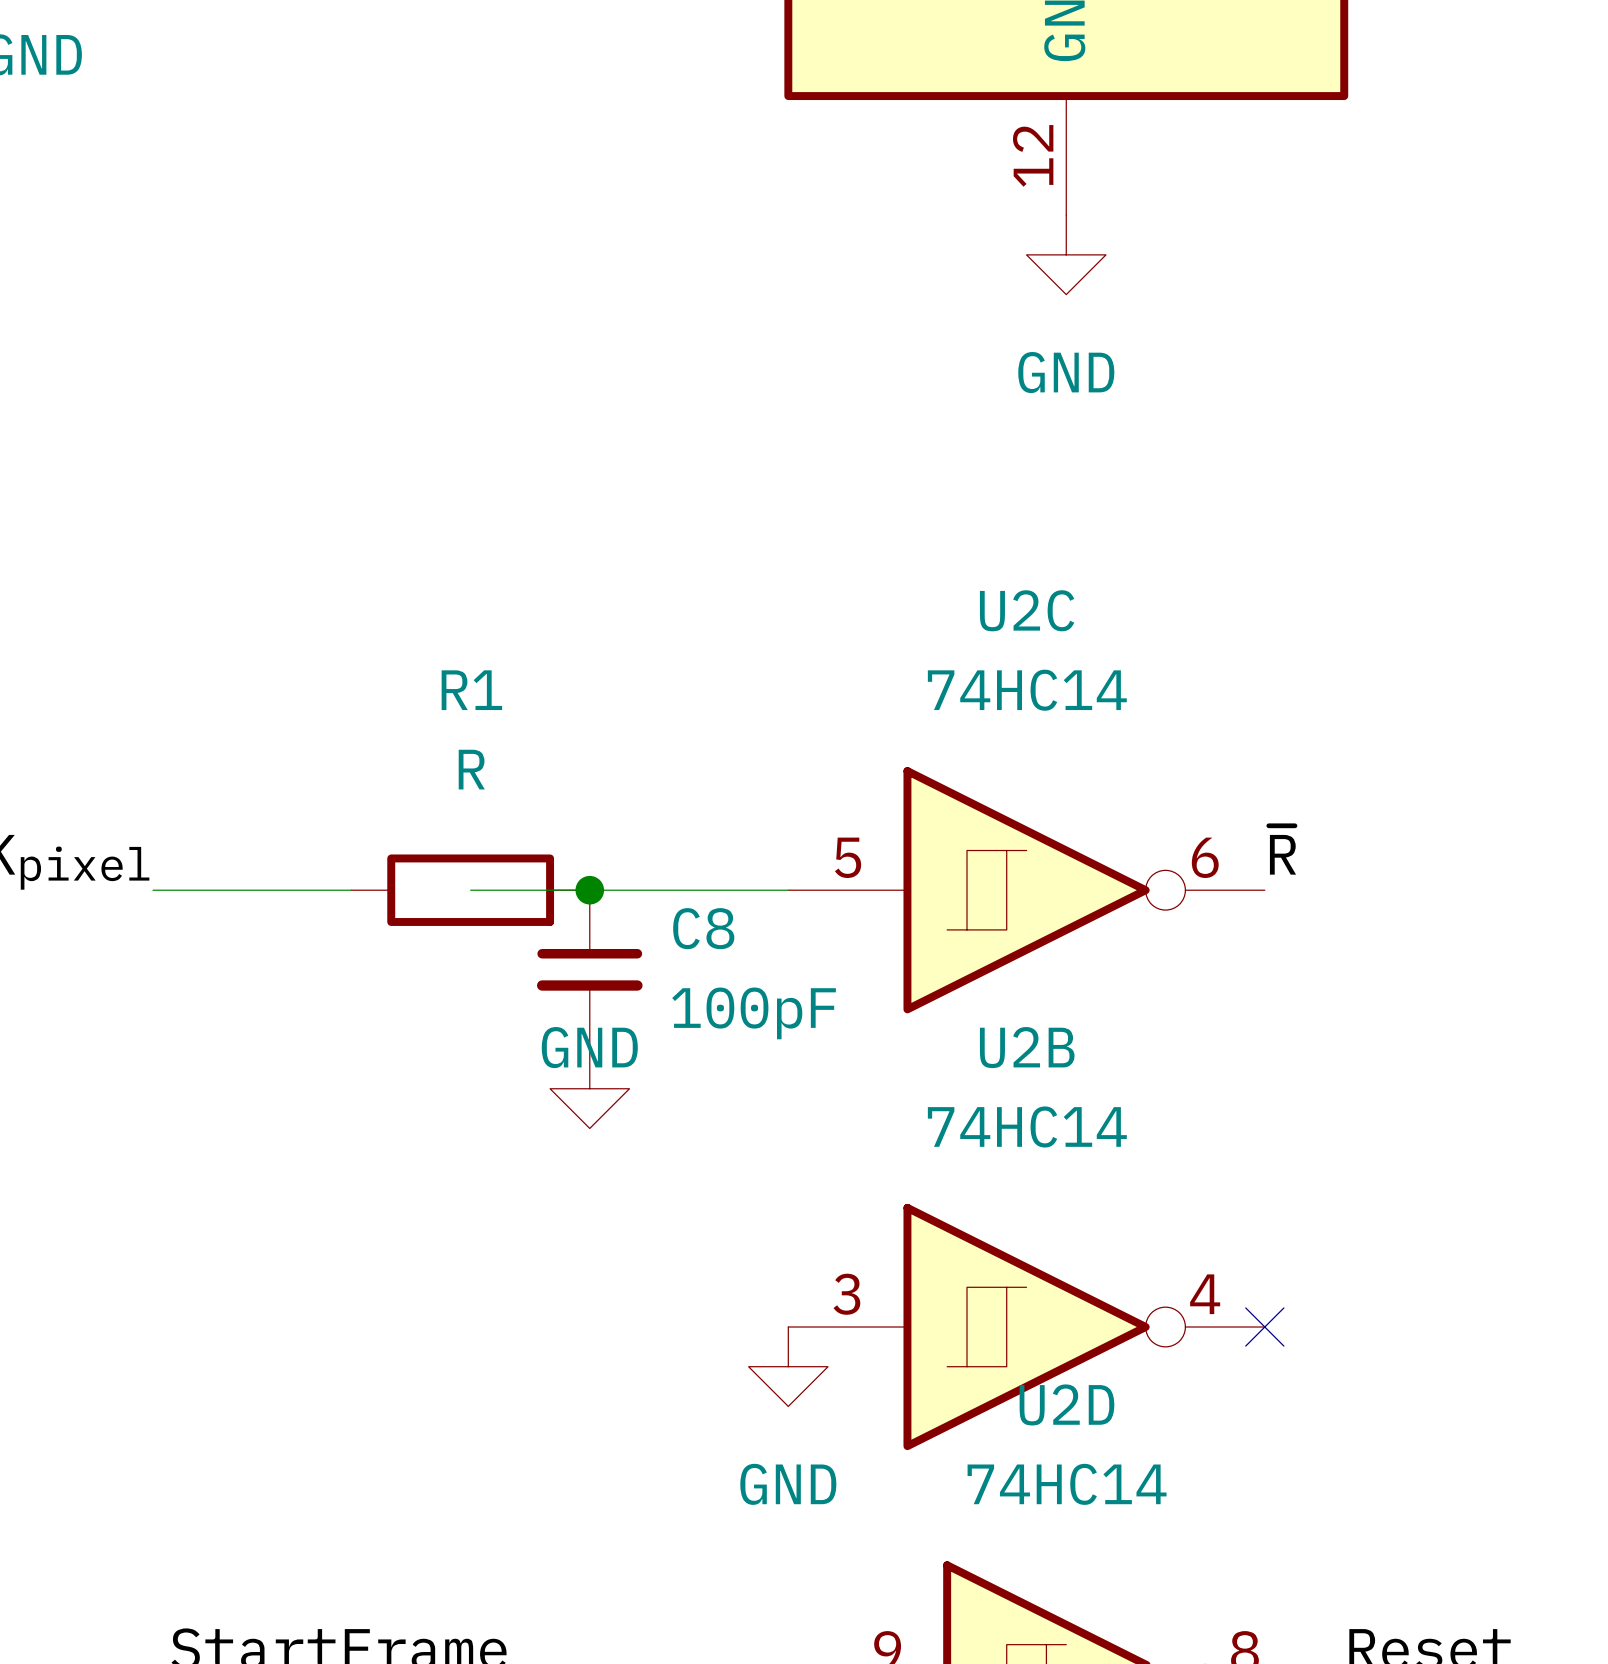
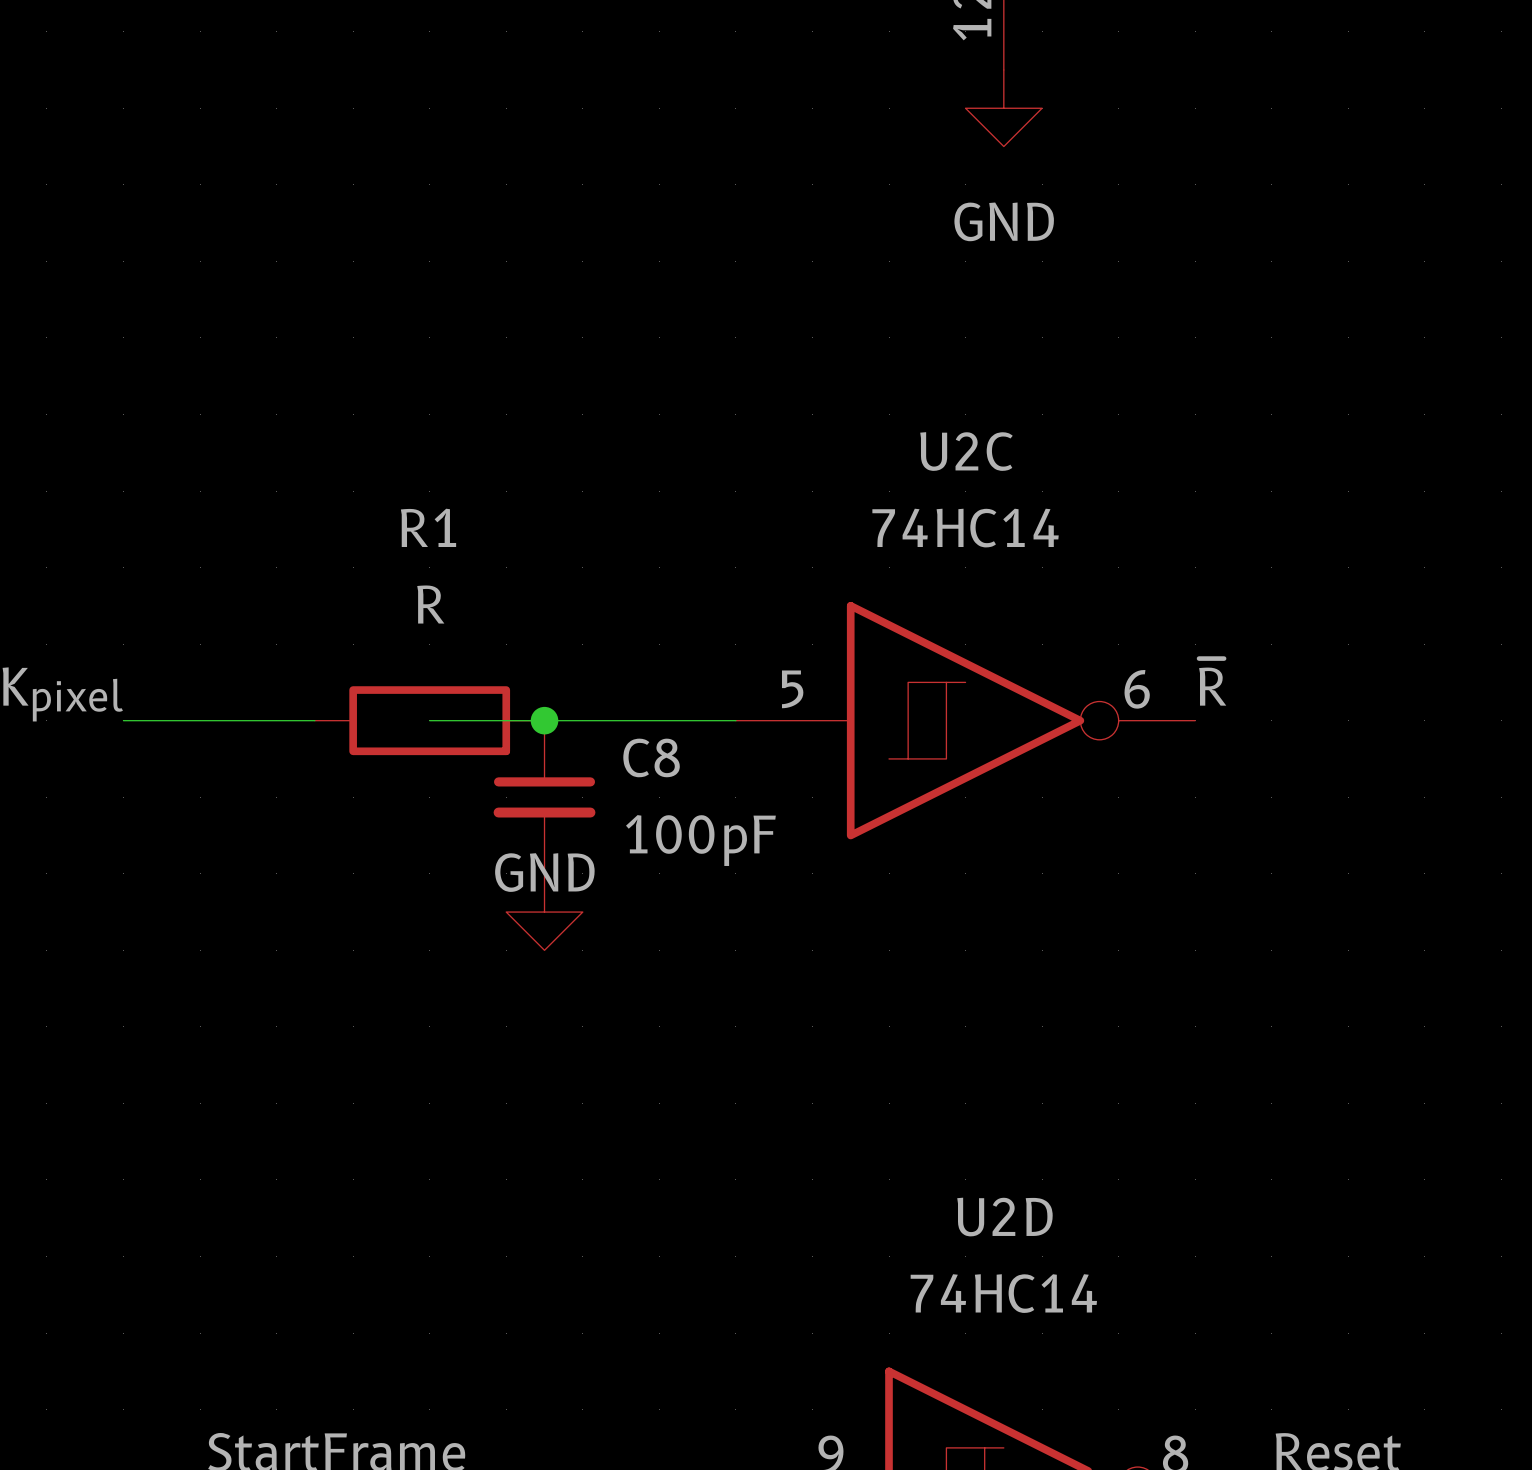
U2B: 74HC14 (1026, 1327) -> none
no-connect mark: (1264, 1327) -> none
power symbol: GND (788, 1366) -> none

